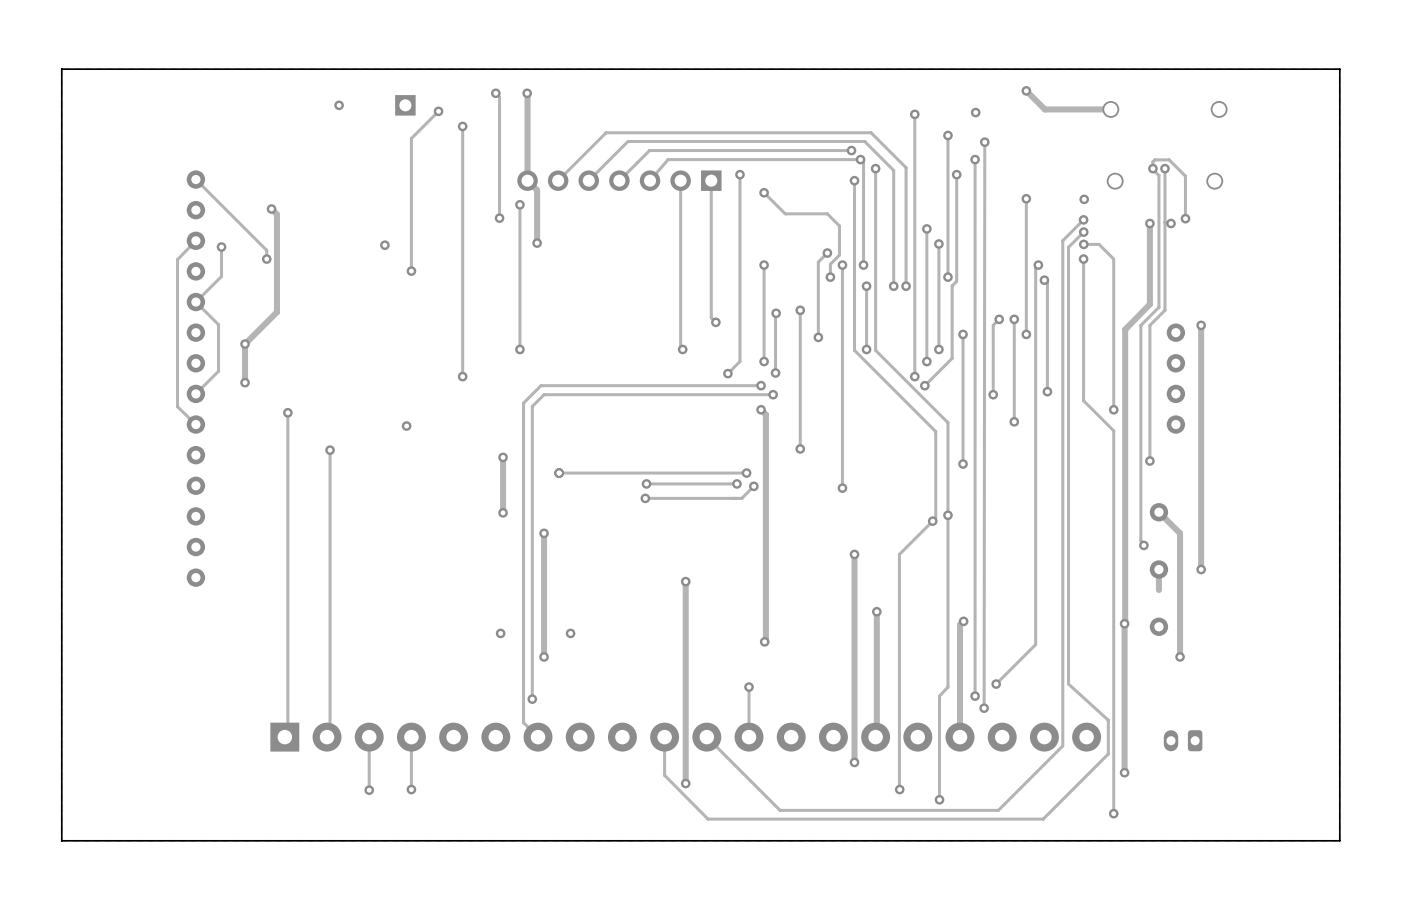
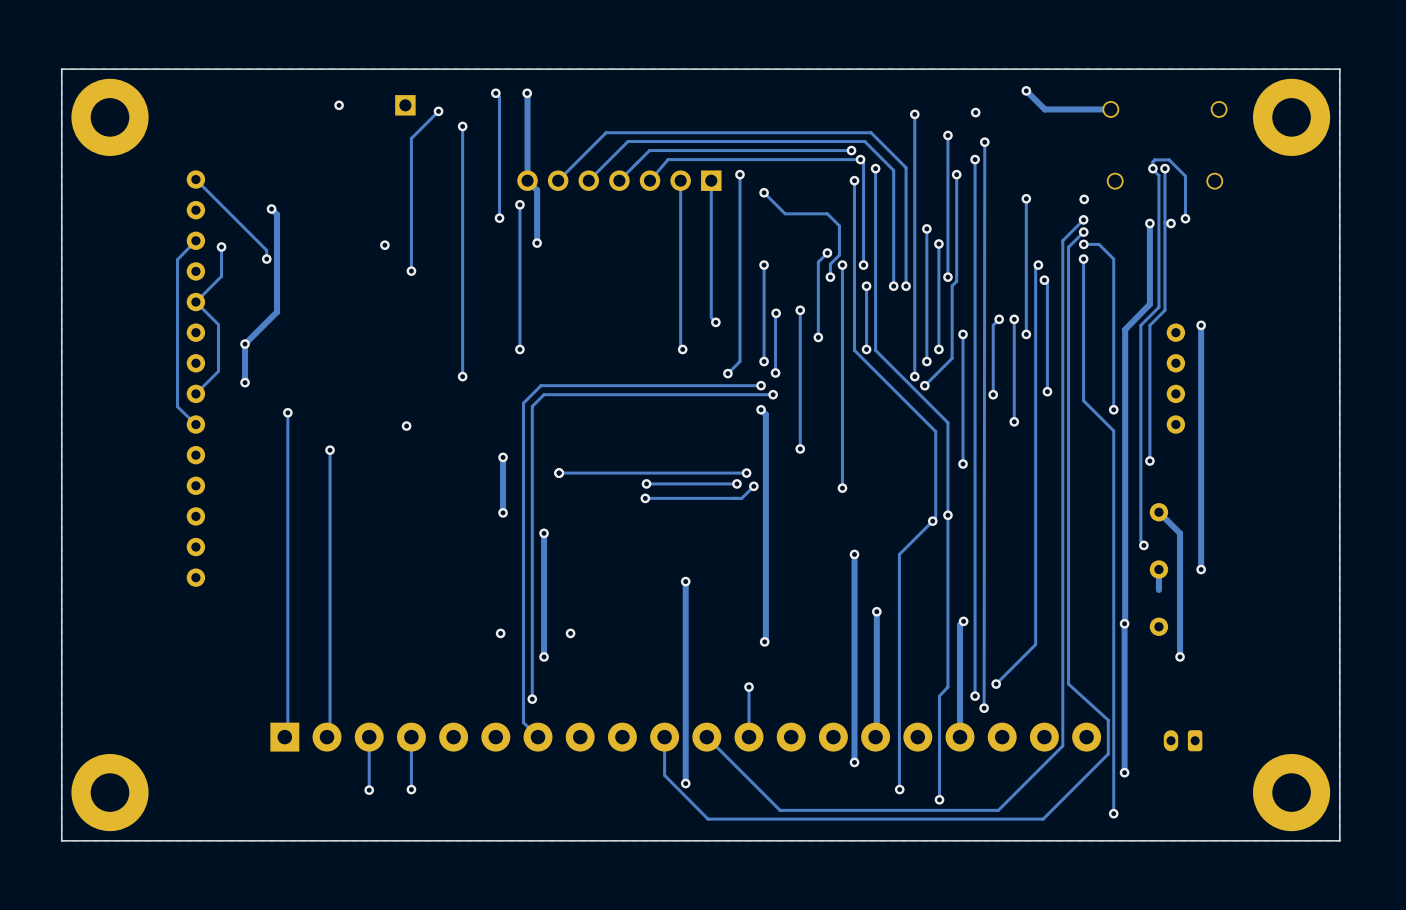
part: none -> (110, 117)
part: none -> (1291, 117)
part: none -> (110, 792)
part: none -> (1291, 792)

